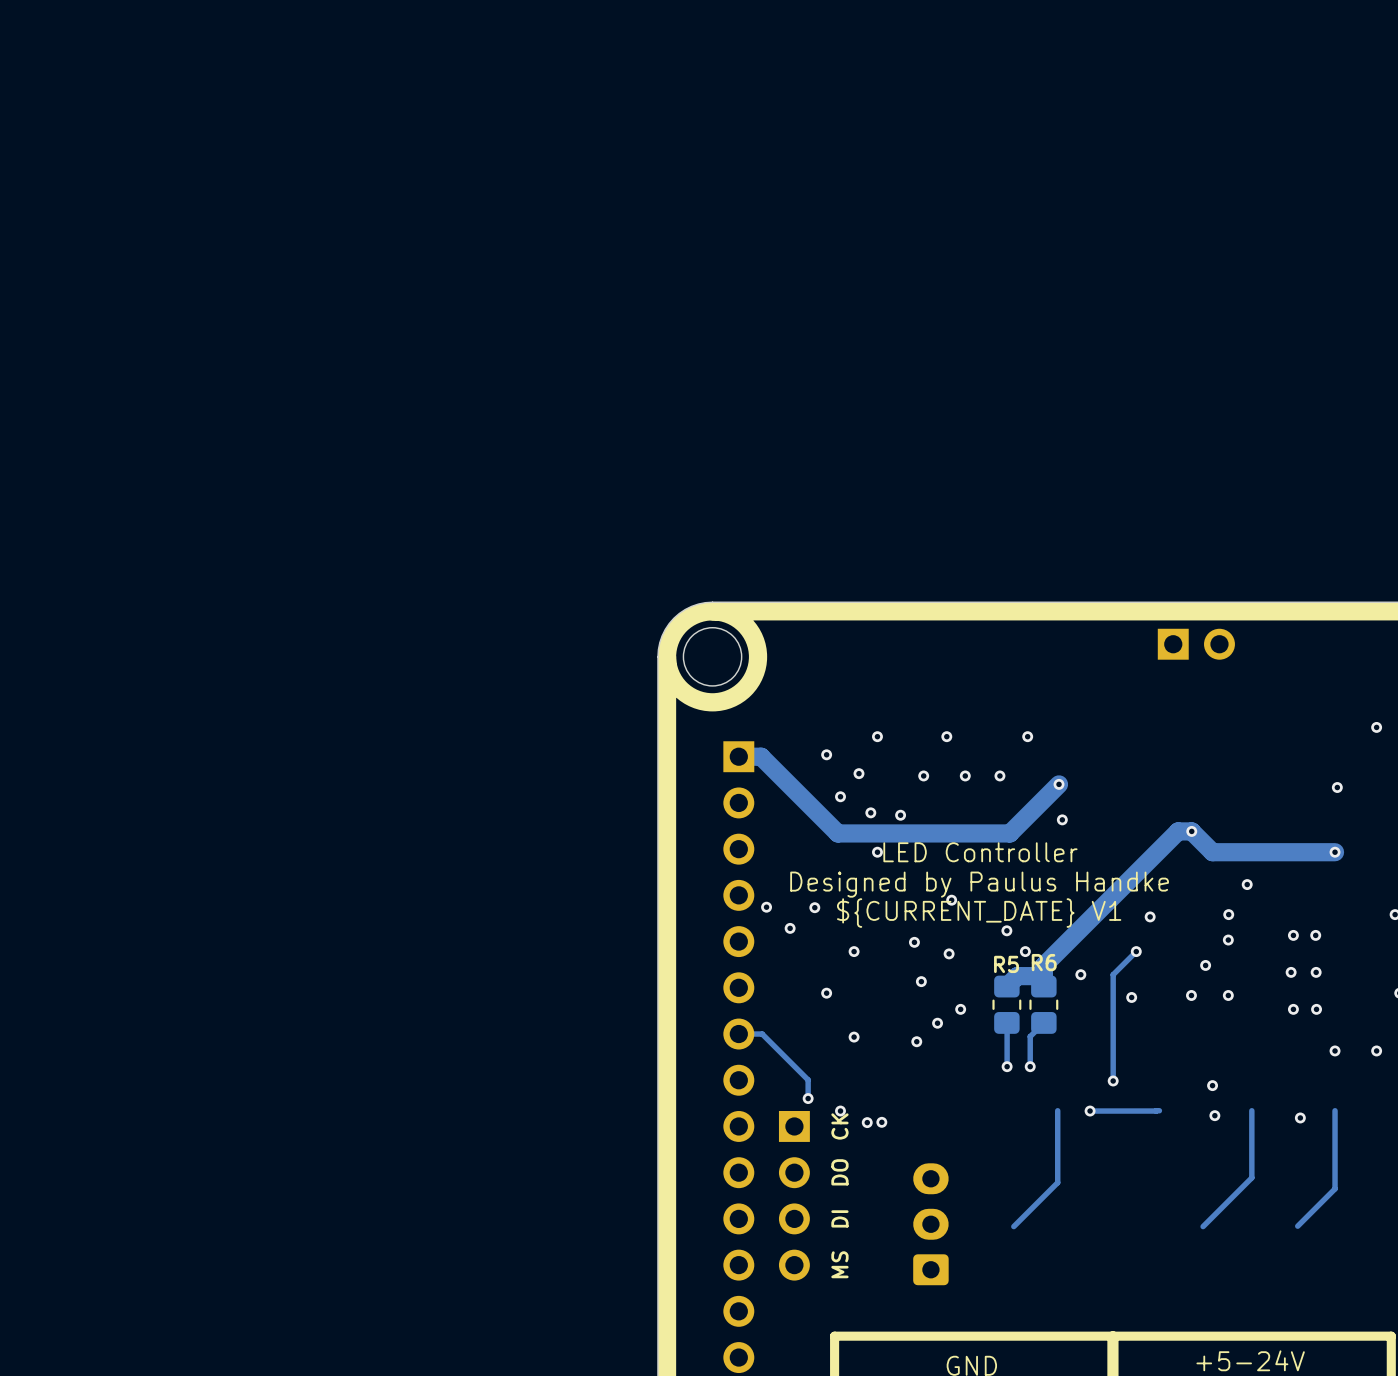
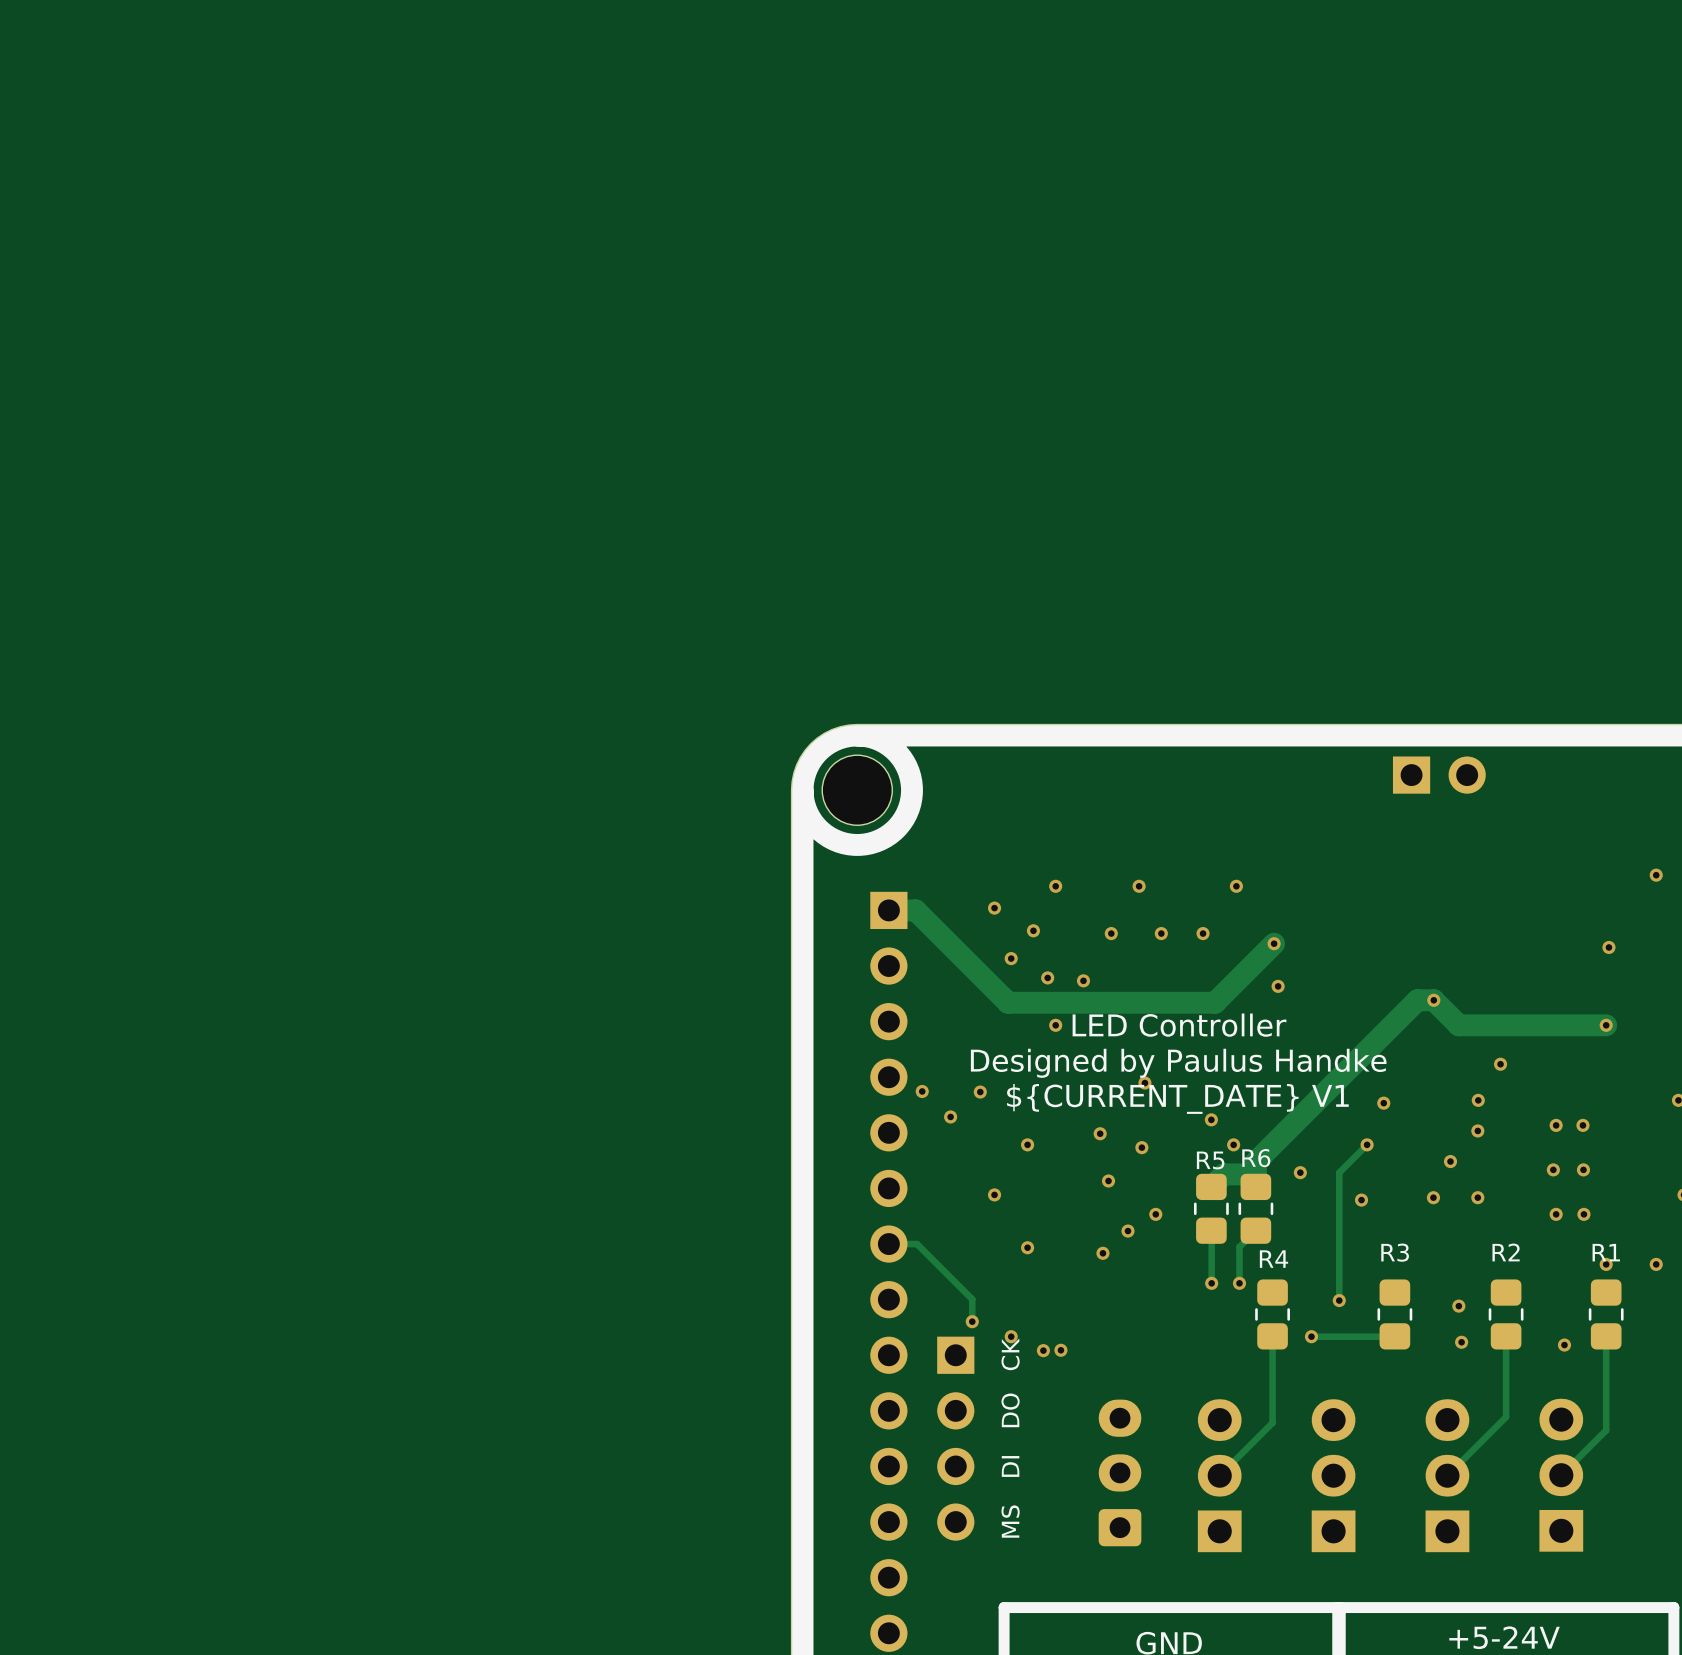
R4: none -> (1272, 1314)
R3: none -> (1394, 1314)
R2: none -> (1506, 1314)
R1: none -> (1606, 1314)
part: none -> (1219, 1475)
part: none -> (1333, 1475)
part: none -> (1447, 1475)
part: none -> (1561, 1475)

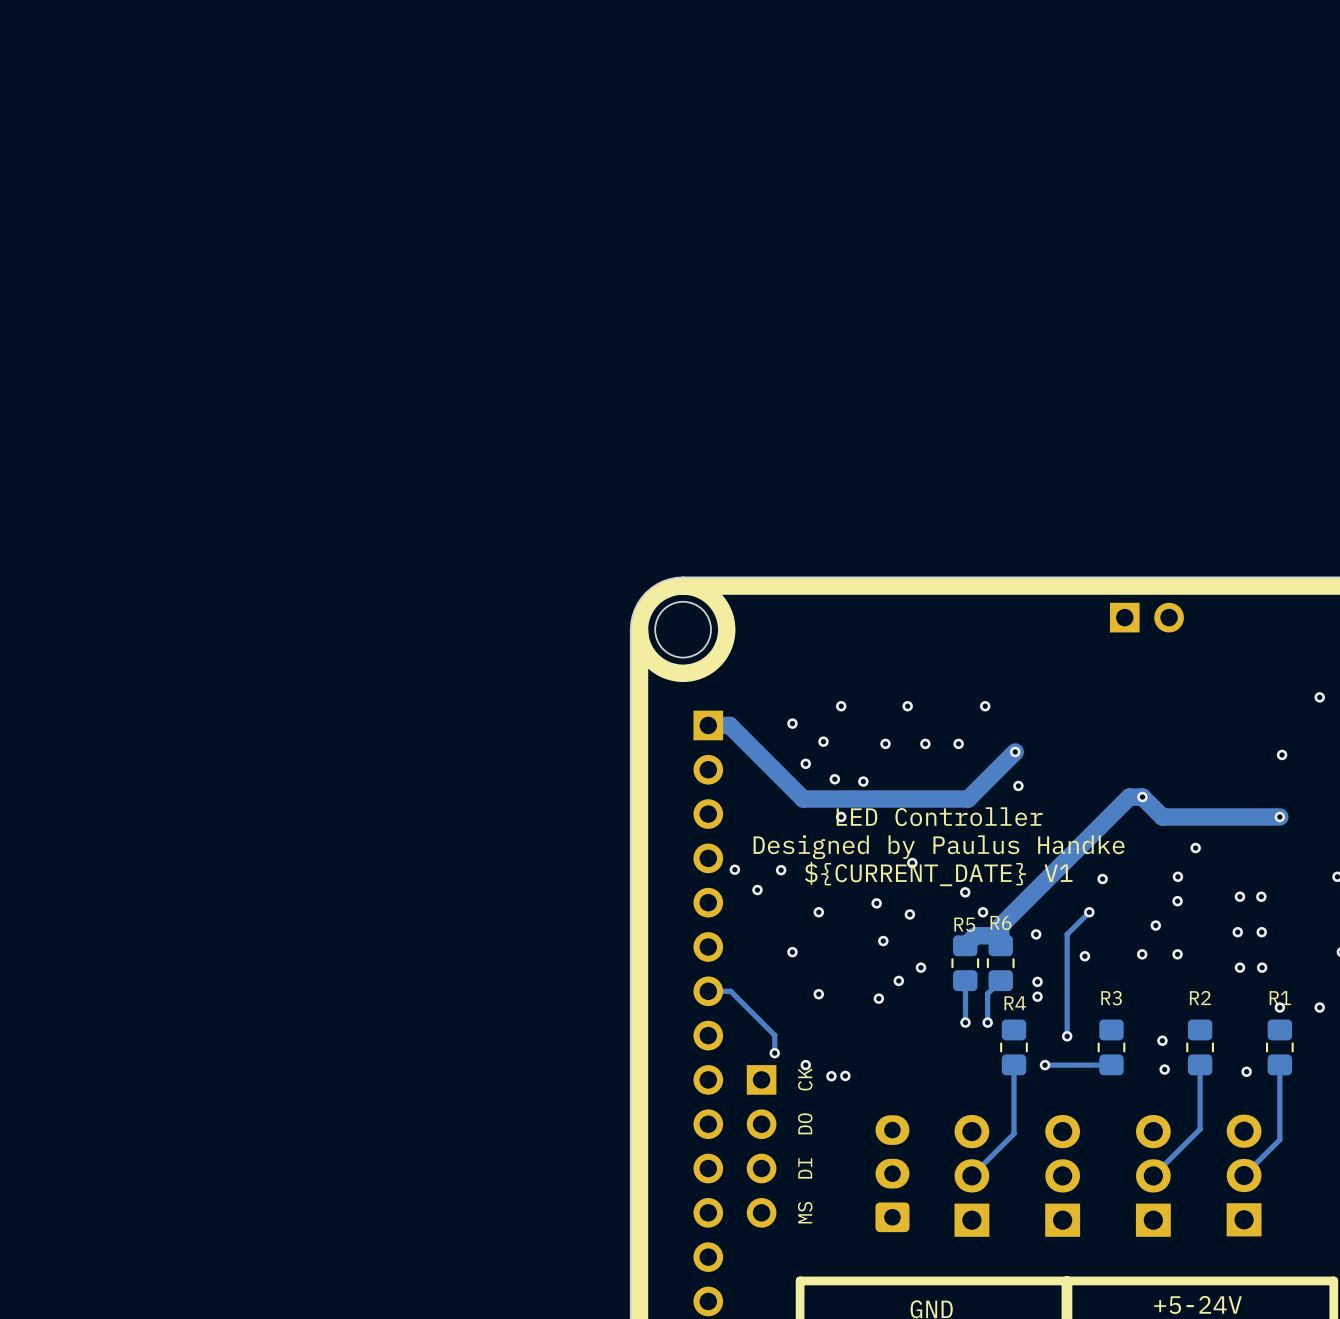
via: none -> (1037, 981)
via: none -> (1037, 996)

